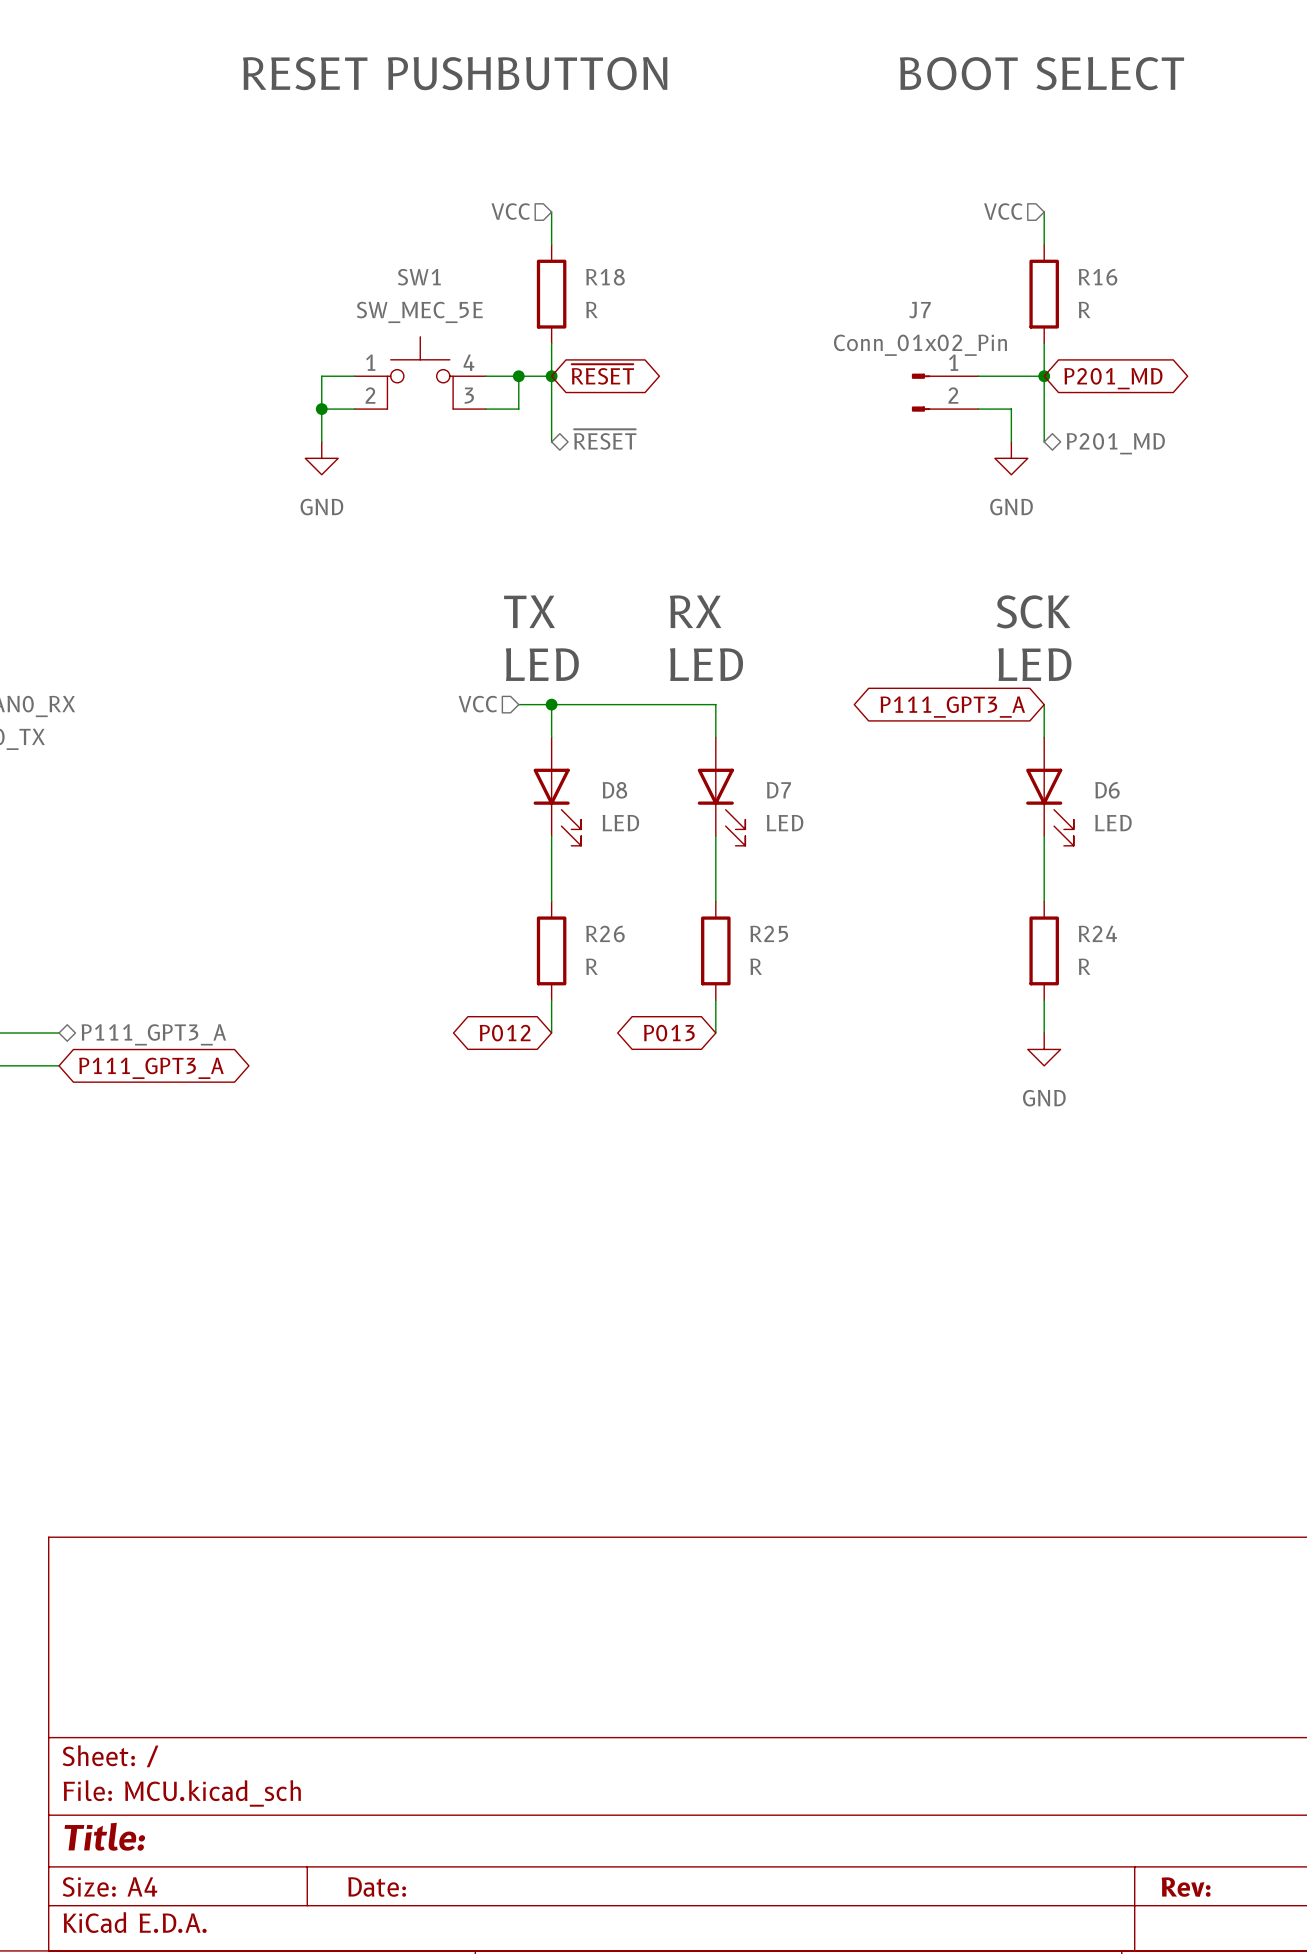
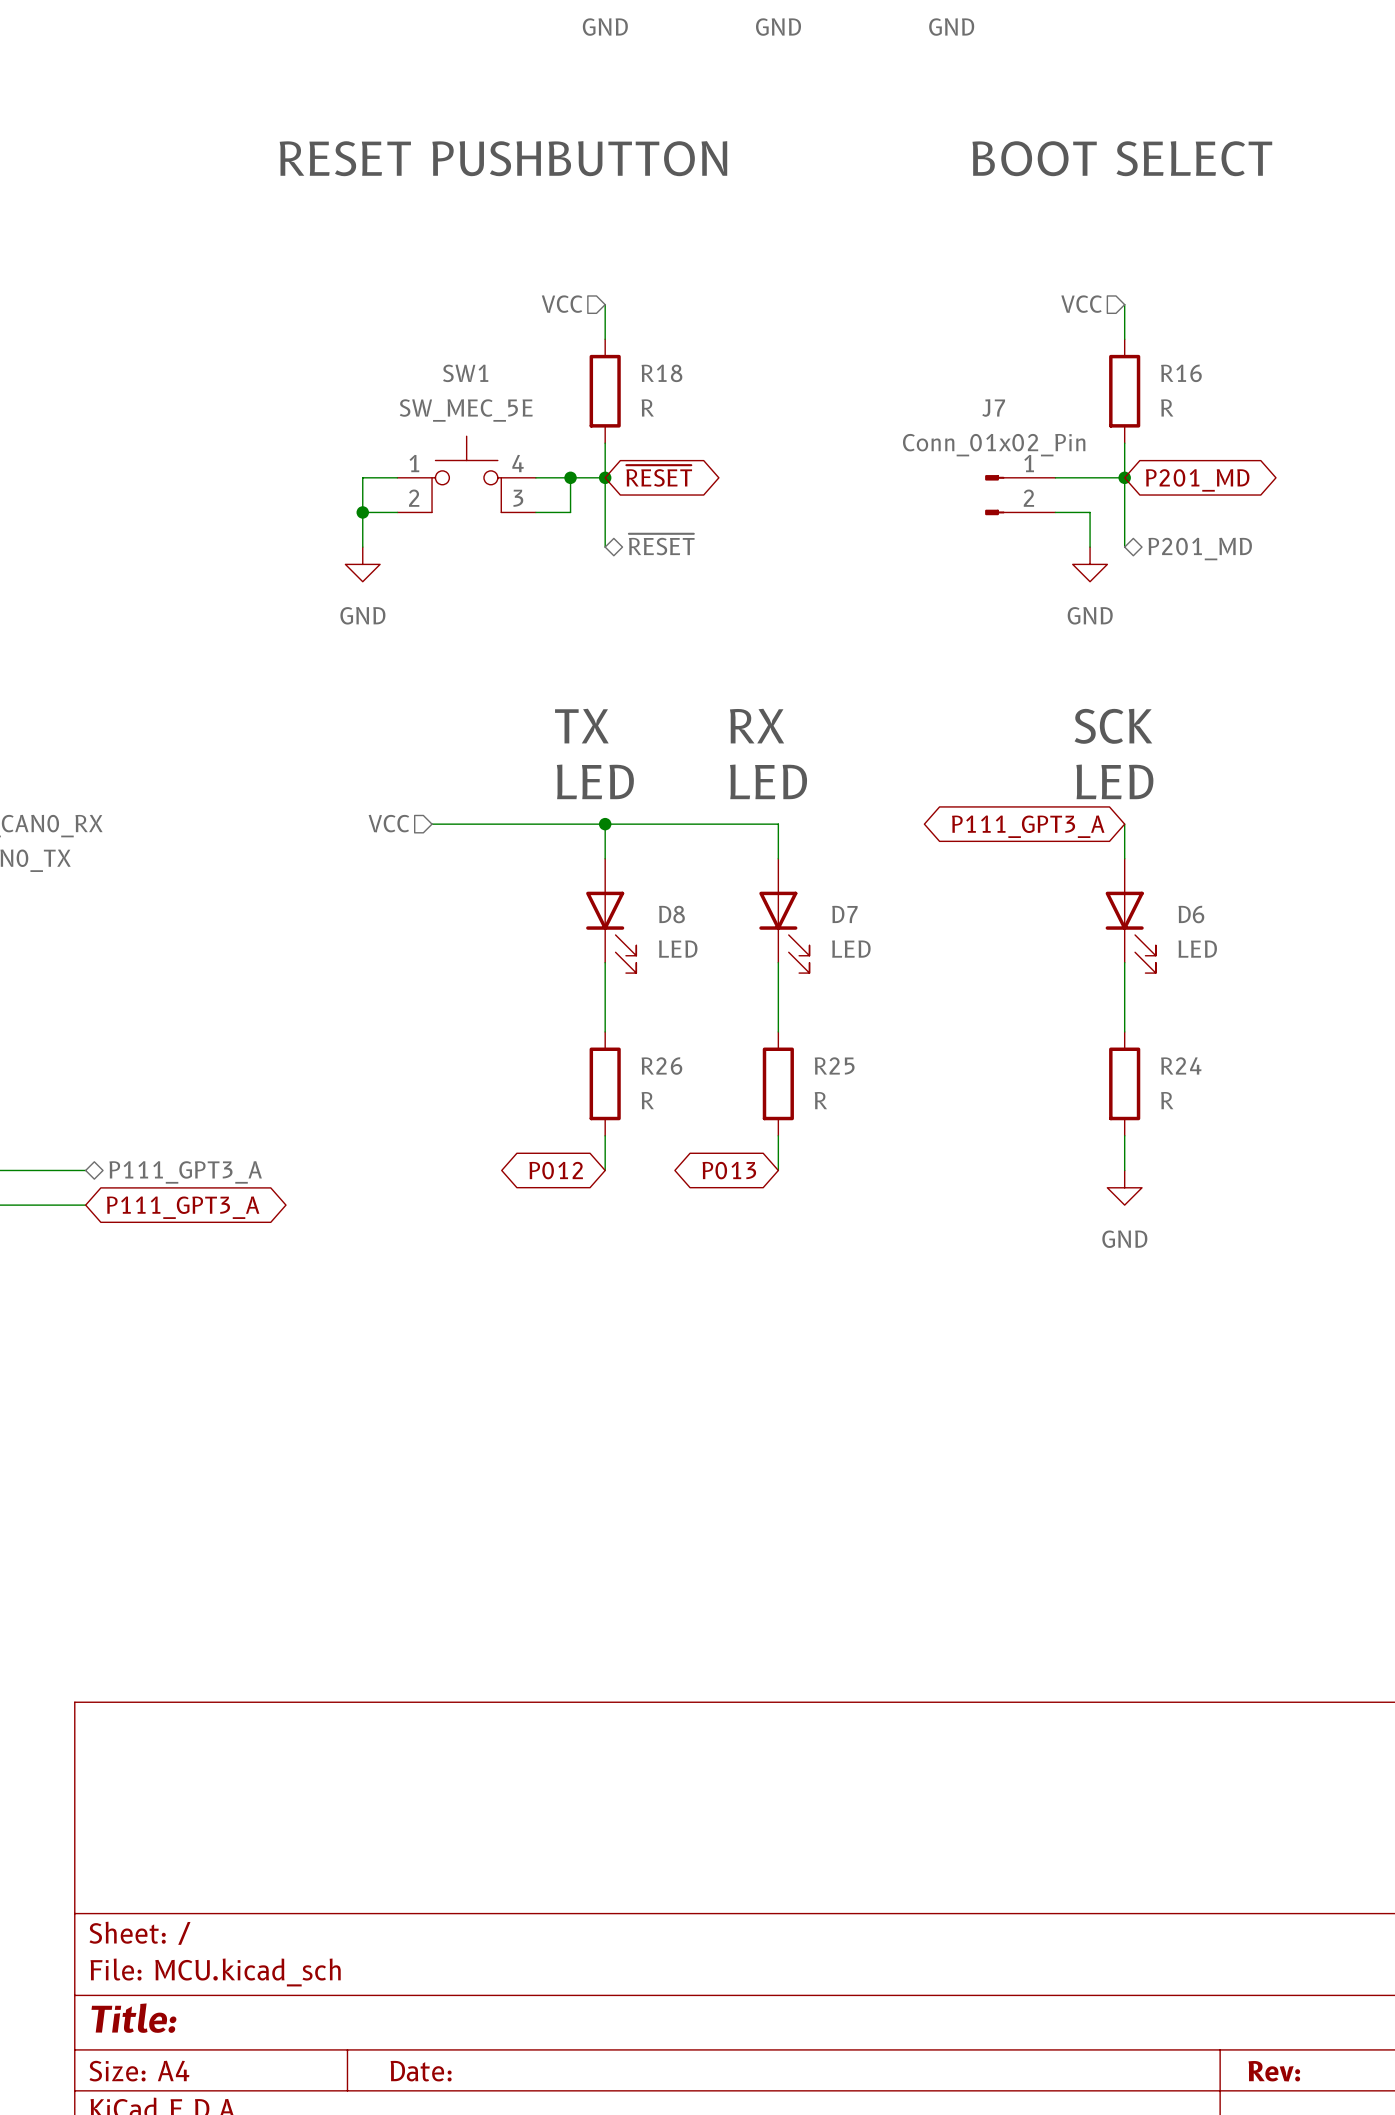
wire: none -> (432, 824) (570, 824)
hierarchical label position: VCC (477, 704) -> VCC (388, 823)

